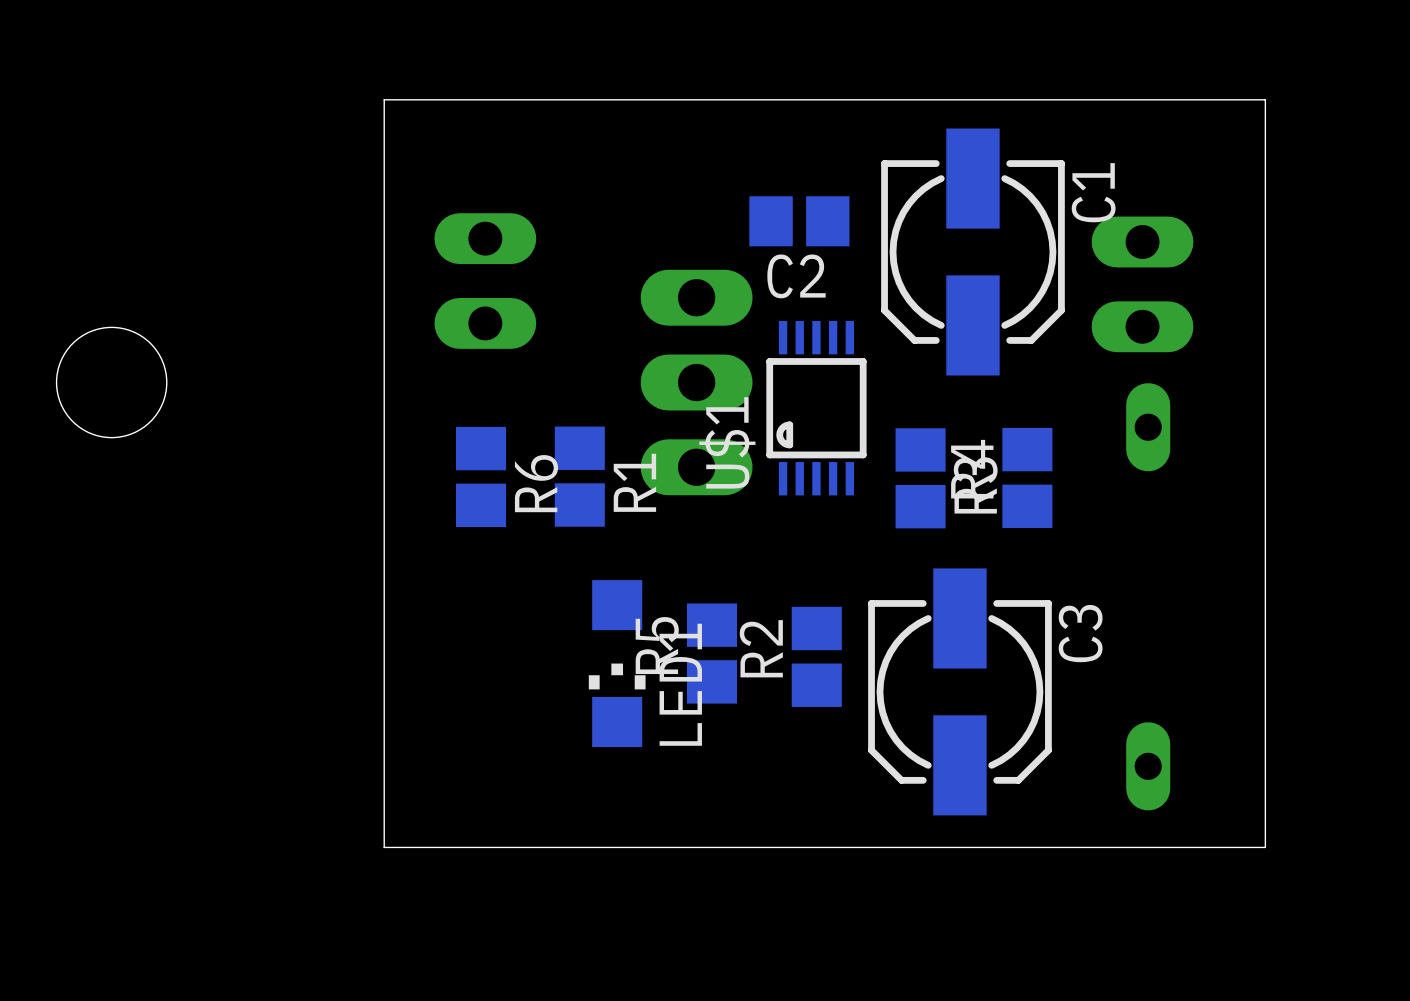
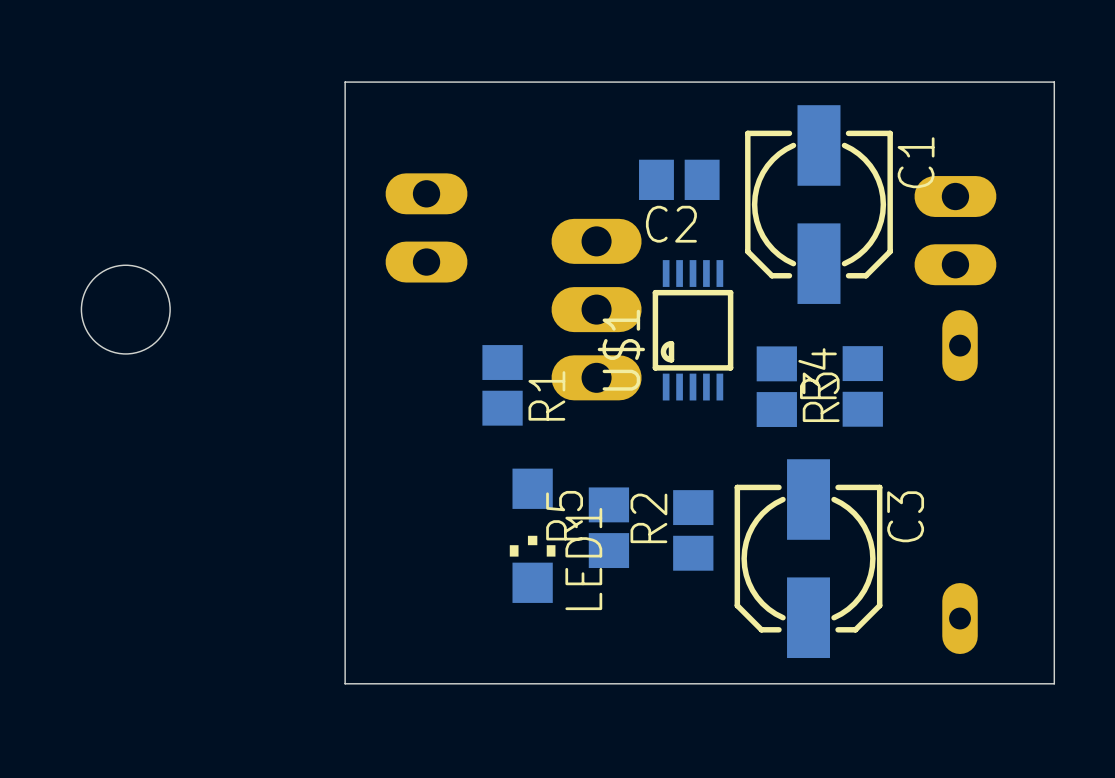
R6: (481, 476) -> none

